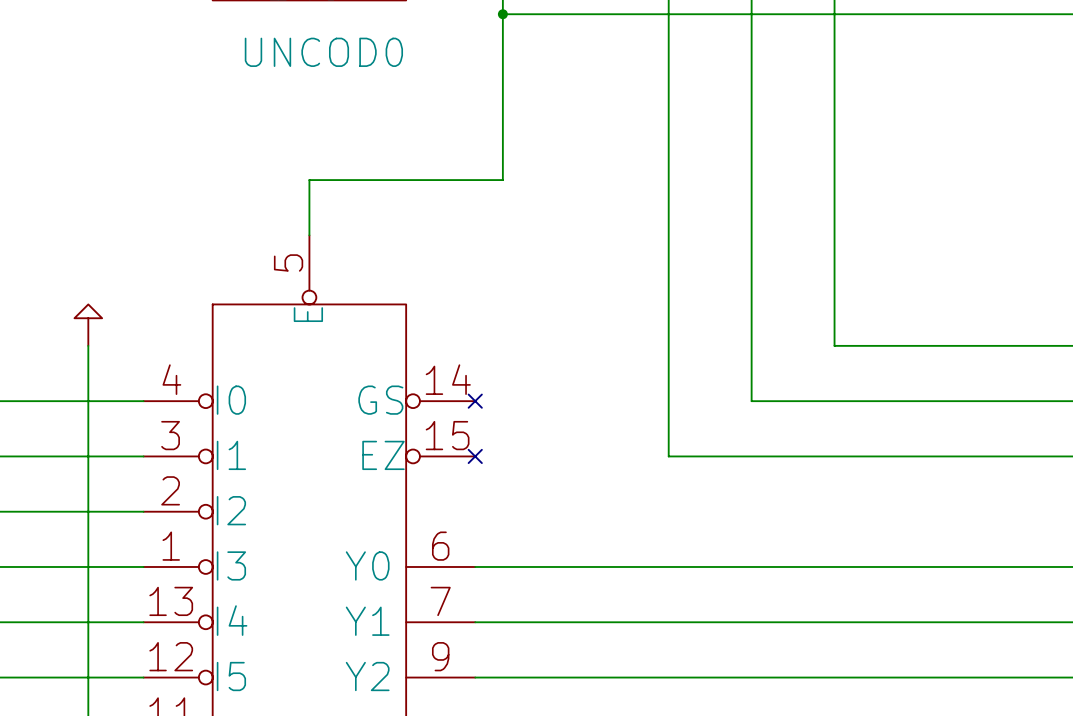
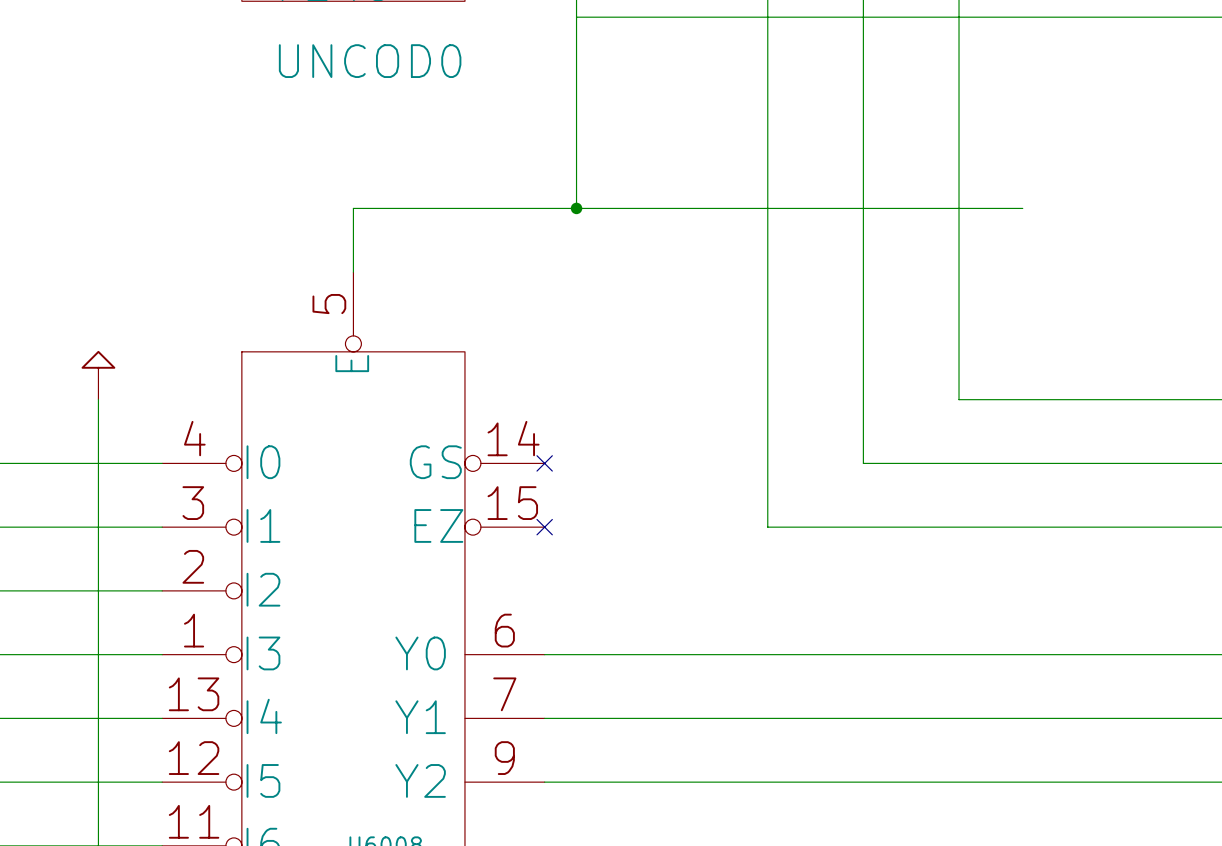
junction: (502, 14) -> none
wire: none -> (576, 208) (1022, 208)
junction: none -> (576, 208)

